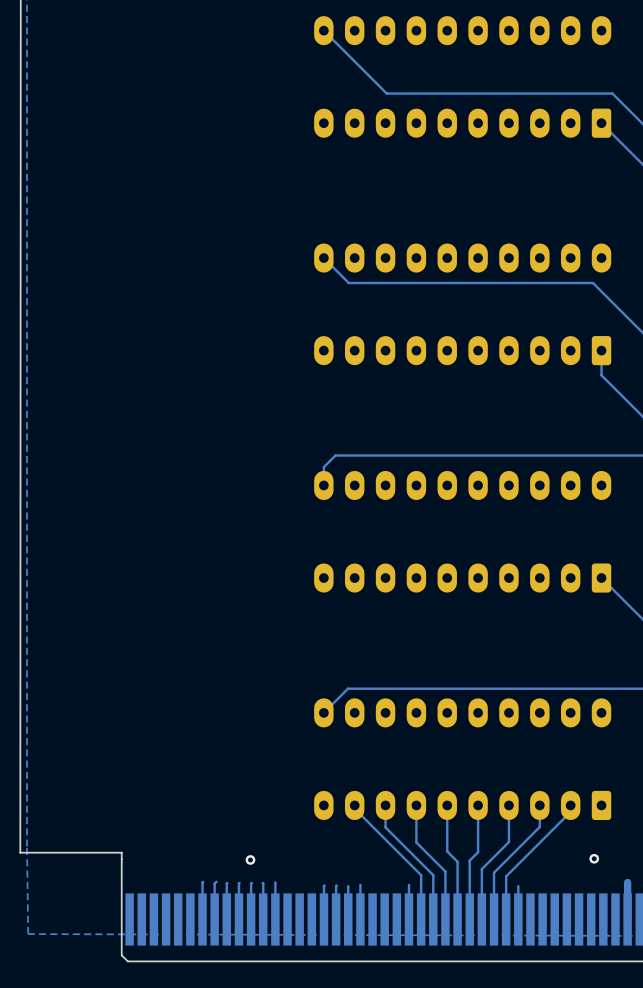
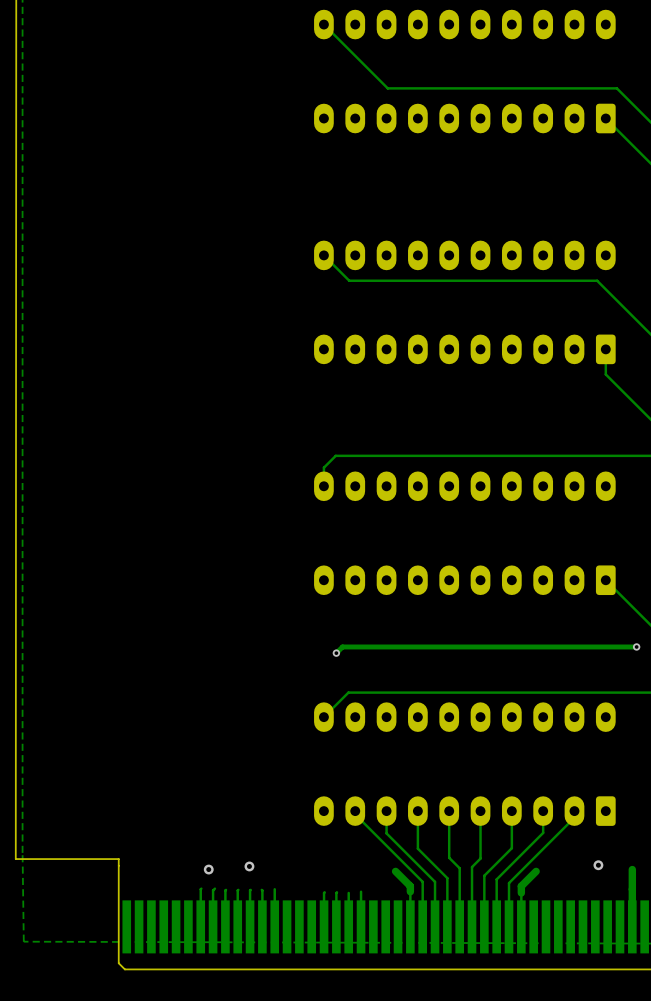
track: none -> (636, 646) (342, 646) (336, 653)
via: none -> (636, 646)
via: none -> (336, 653)
via: none -> (208, 869)
track: none -> (632, 869) (632, 889)
track: none -> (395, 871) (410, 886) (410, 891)
track: none -> (536, 871) (521, 886) (521, 892)

